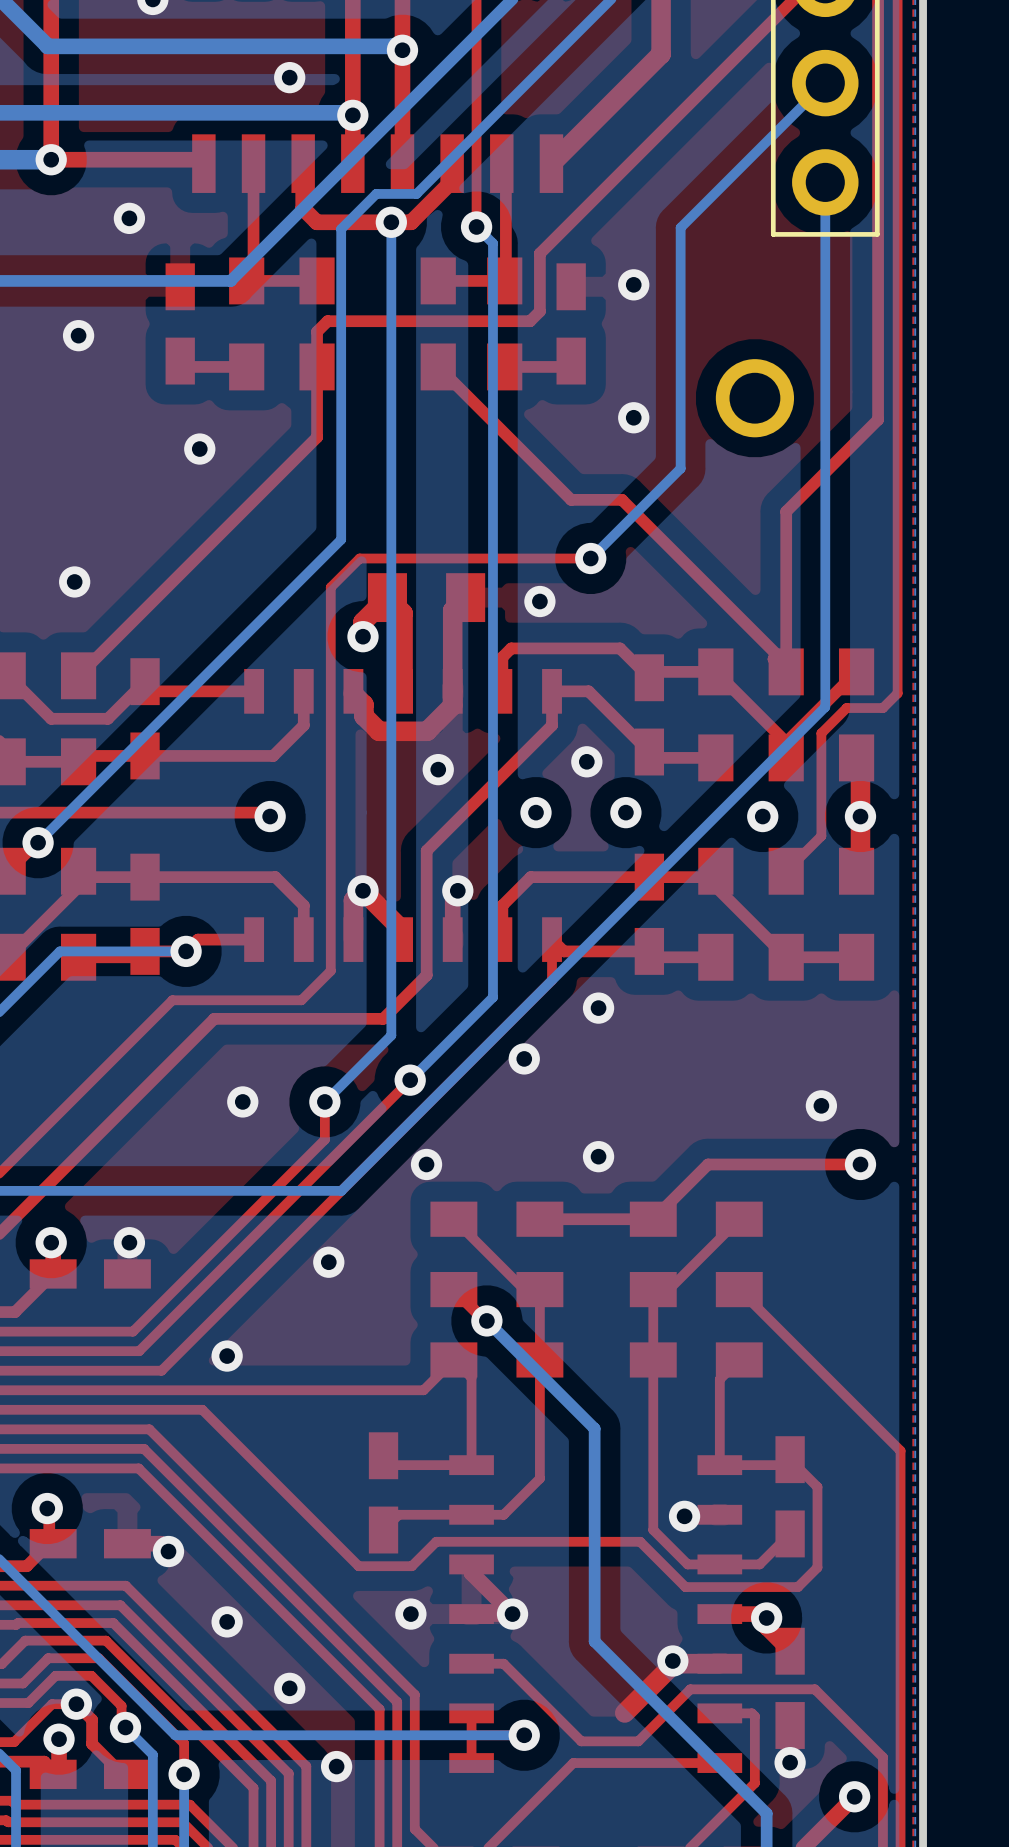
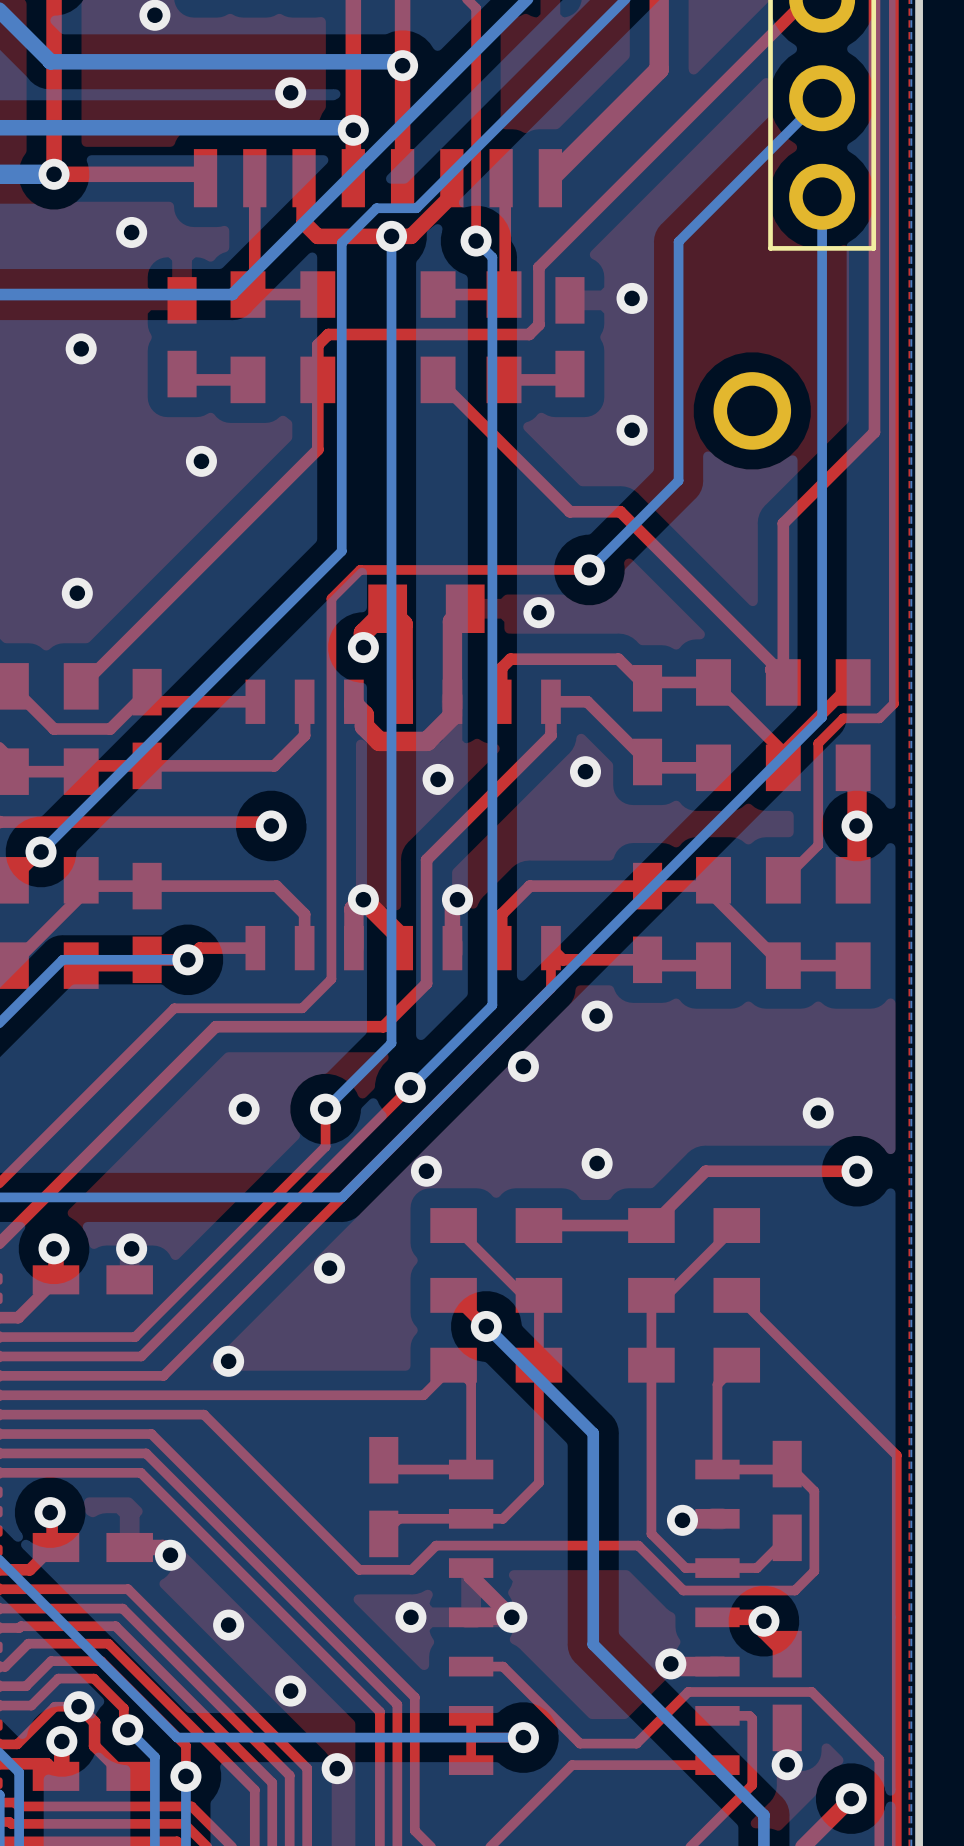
via: (535, 812) -> none
via: (625, 812) -> none
via: (762, 816) -> none
top track: (674, 1663) (624, 1713) -> none

